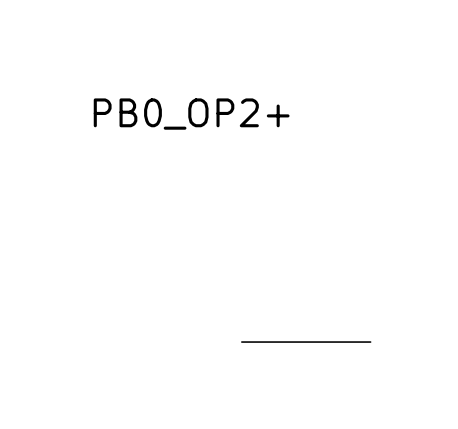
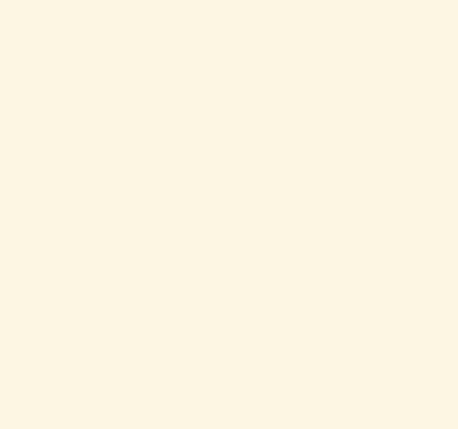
label: PB0_OP2+ (191, 114) -> none
wire: (241, 342) (370, 342) -> none

